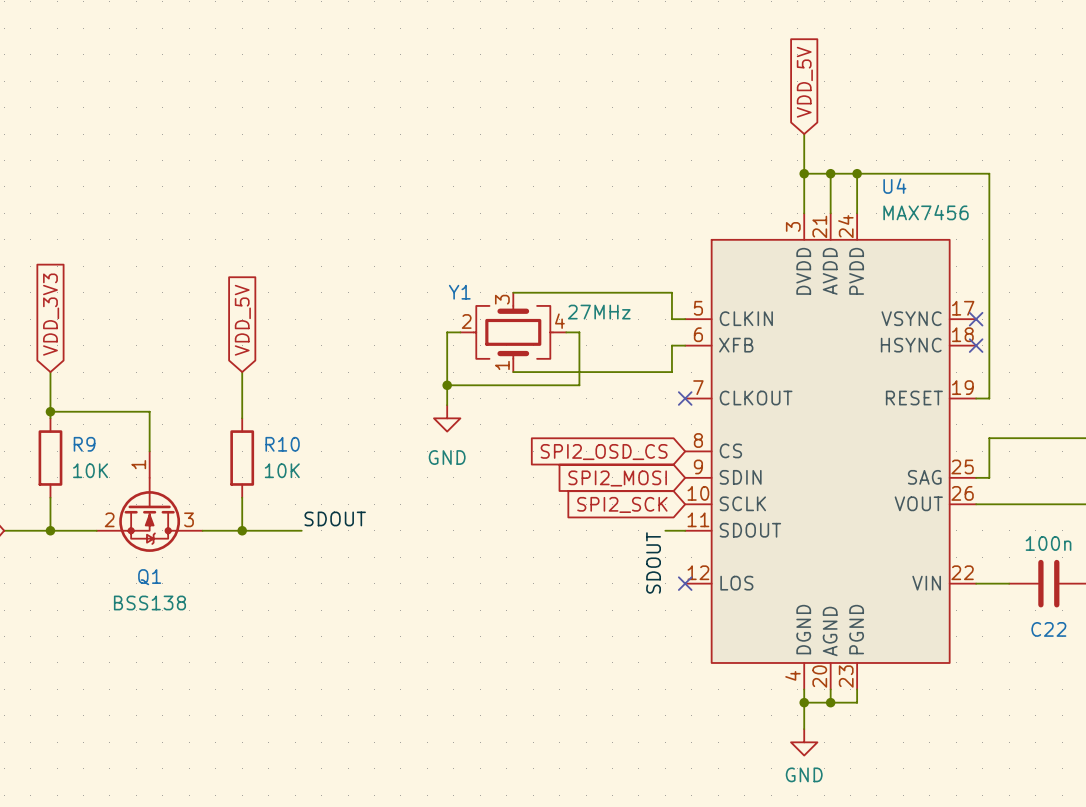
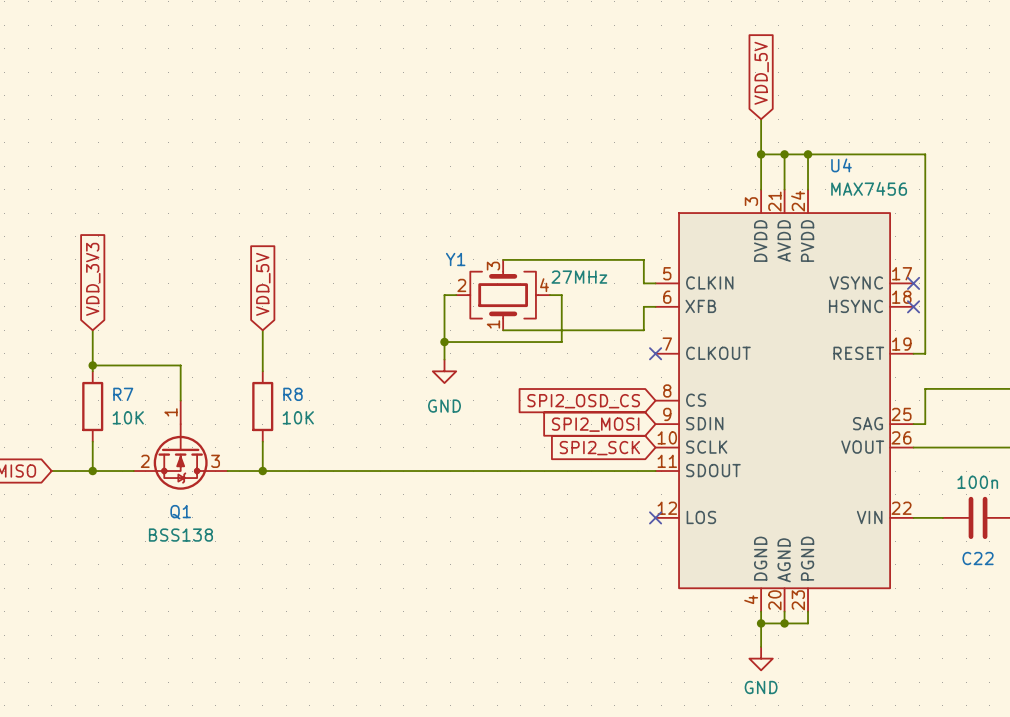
R9 name: R9 (84, 444) -> R7 (123, 394)
R10 name: R10 (282, 444) -> R8 (292, 394)
label: SDOUT (335, 518) -> none
wire: none -> (315, 471) (637, 471)
label: SDOUT (653, 562) -> none

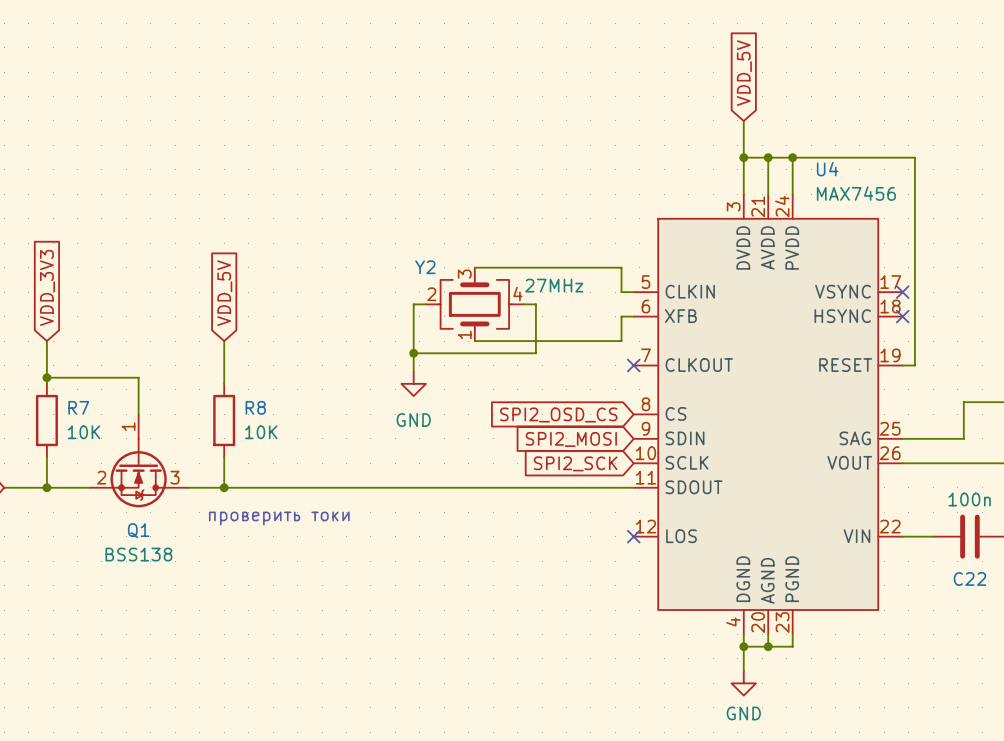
Y1 name: Y1 (455, 259) -> Y2 (425, 267)
wire: (972, 388) (925, 388) (925, 424) -> (963, 402) (963, 438) (914, 438)
text: none -> проверить токи (279, 518)

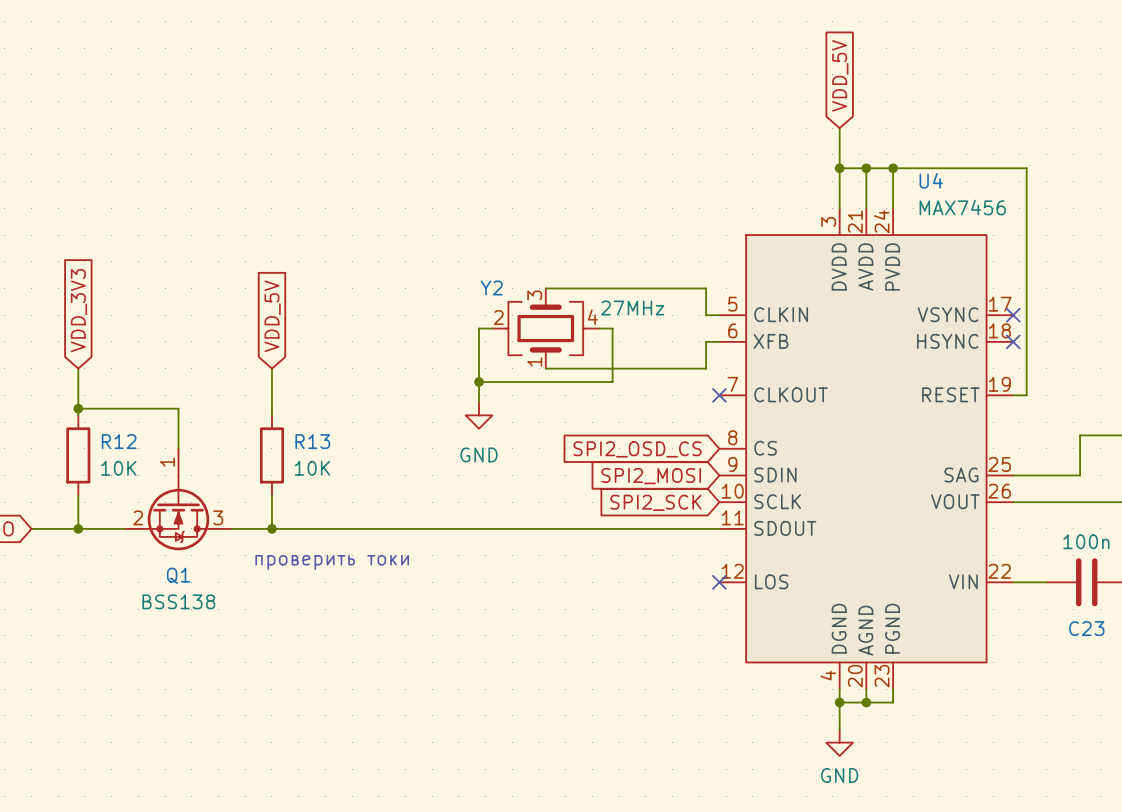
R7 name: R7 (78, 407) -> R12 (119, 441)
R8 name: R8 (255, 407) -> R13 (312, 441)
C22 name: C22 (969, 578) -> C23 (1086, 628)

